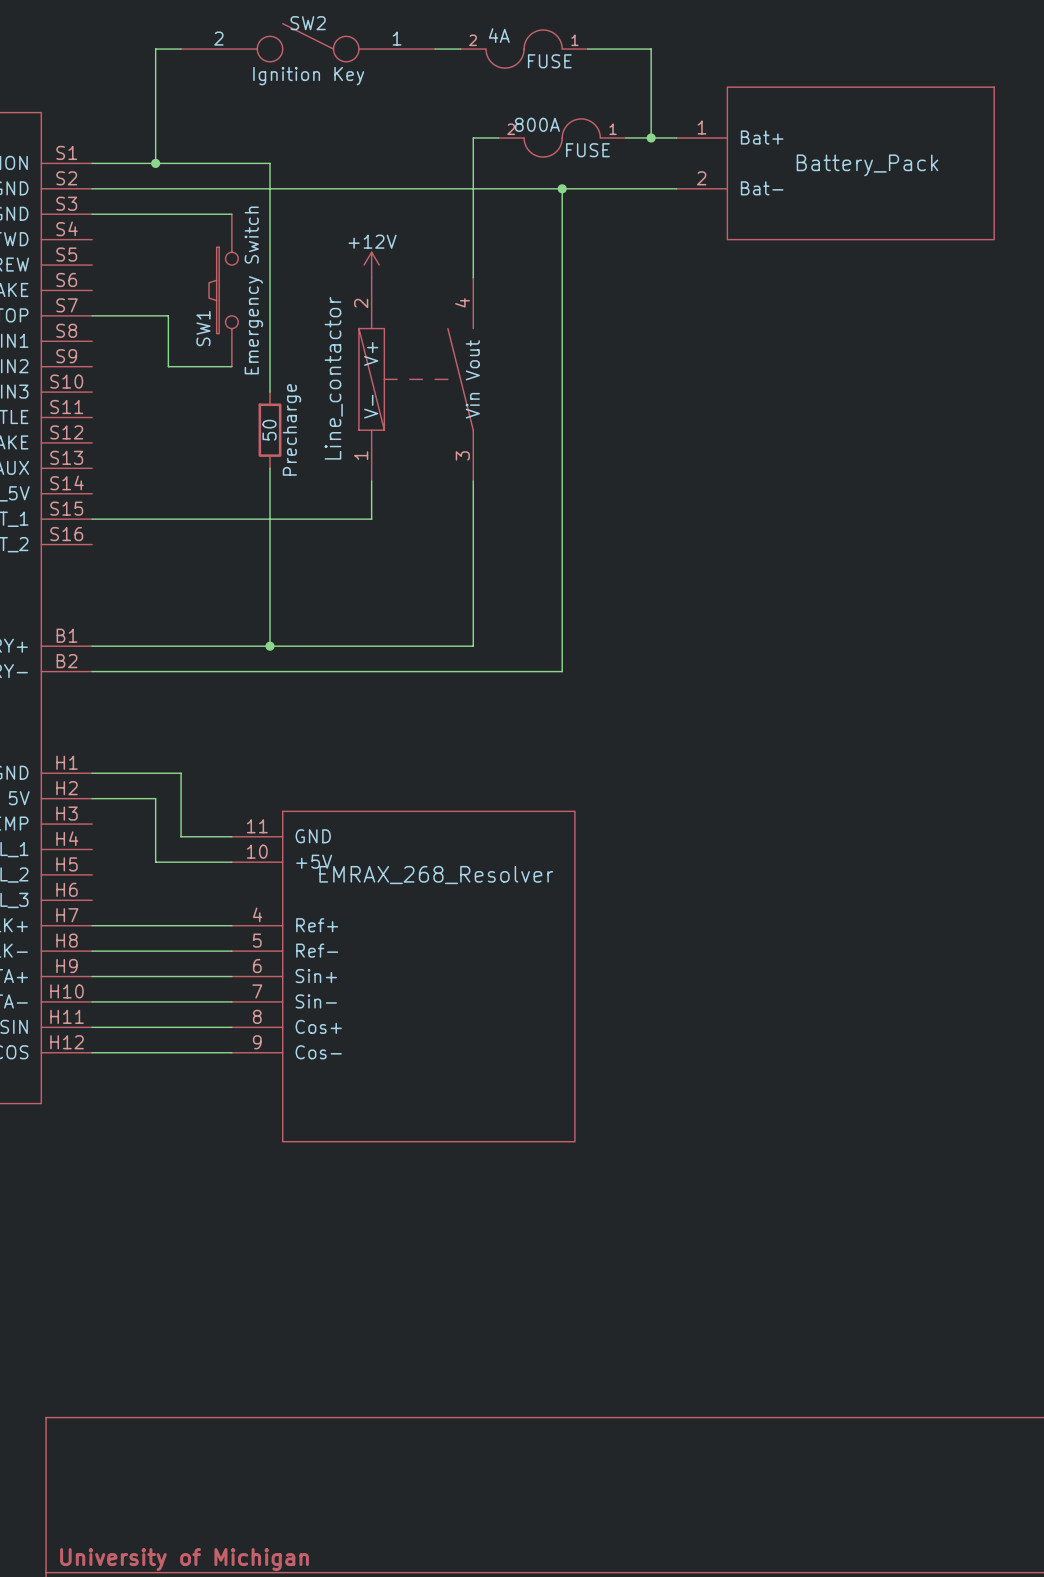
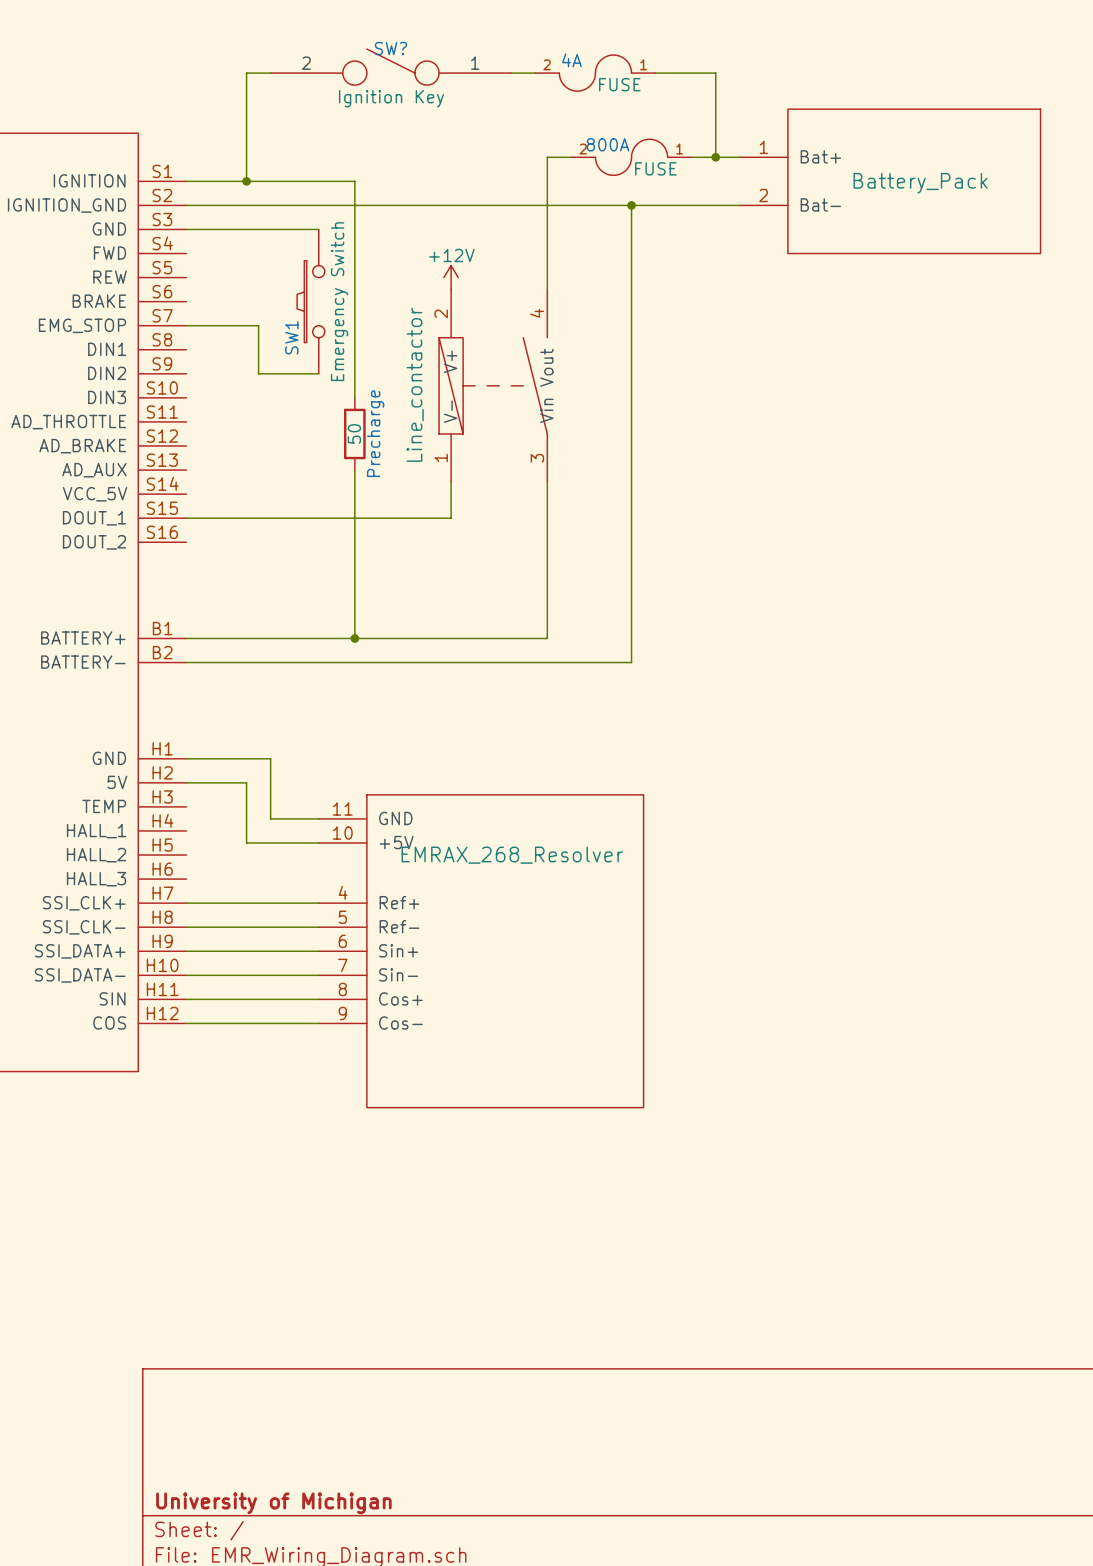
SW2 name: SW2 (308, 23) -> SW? (390, 48)

